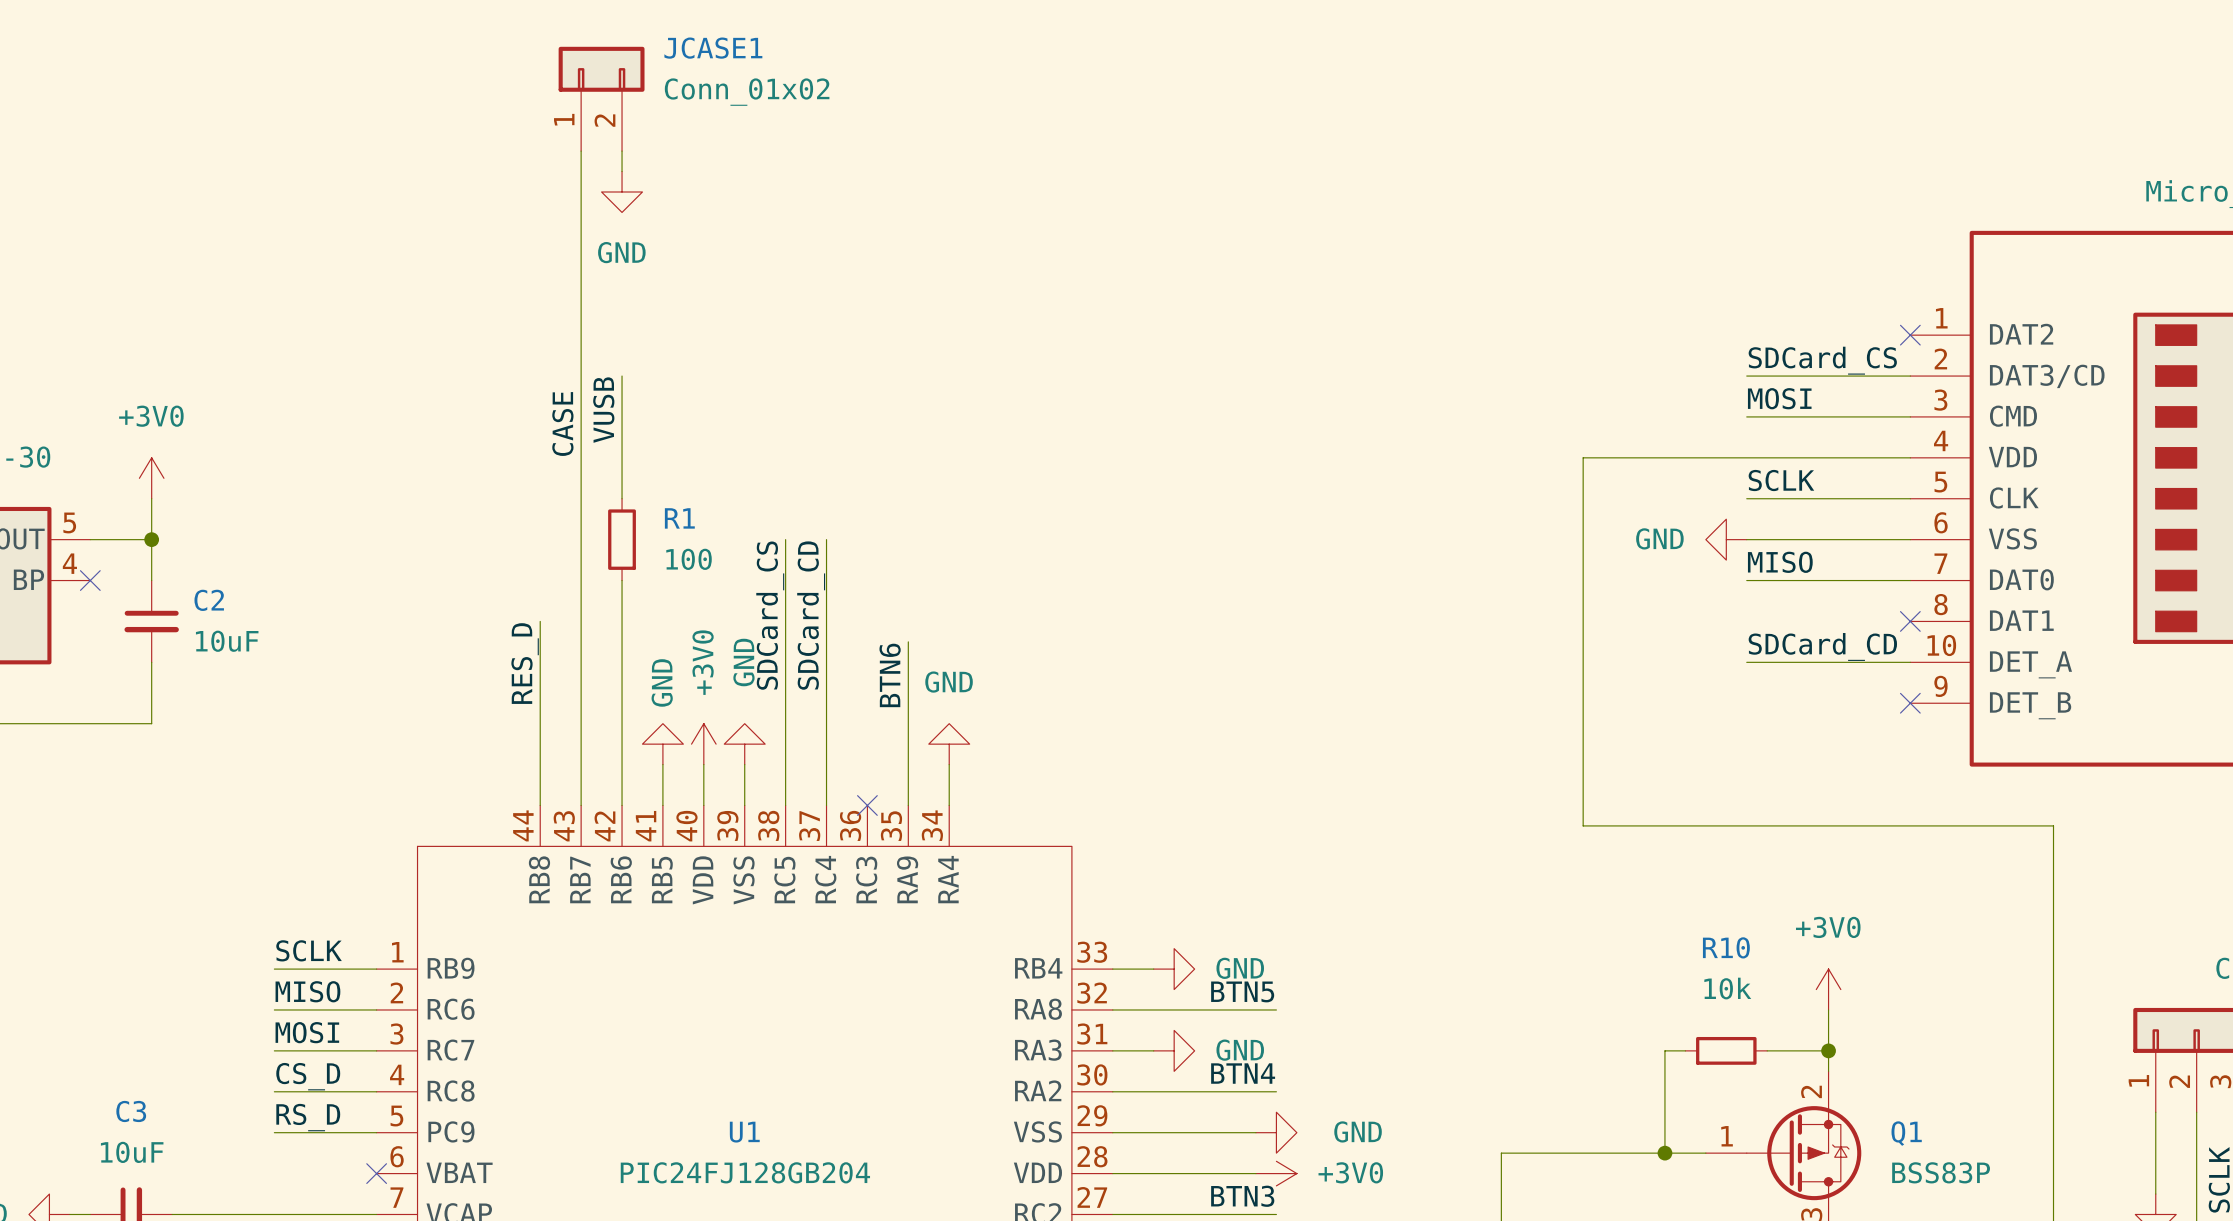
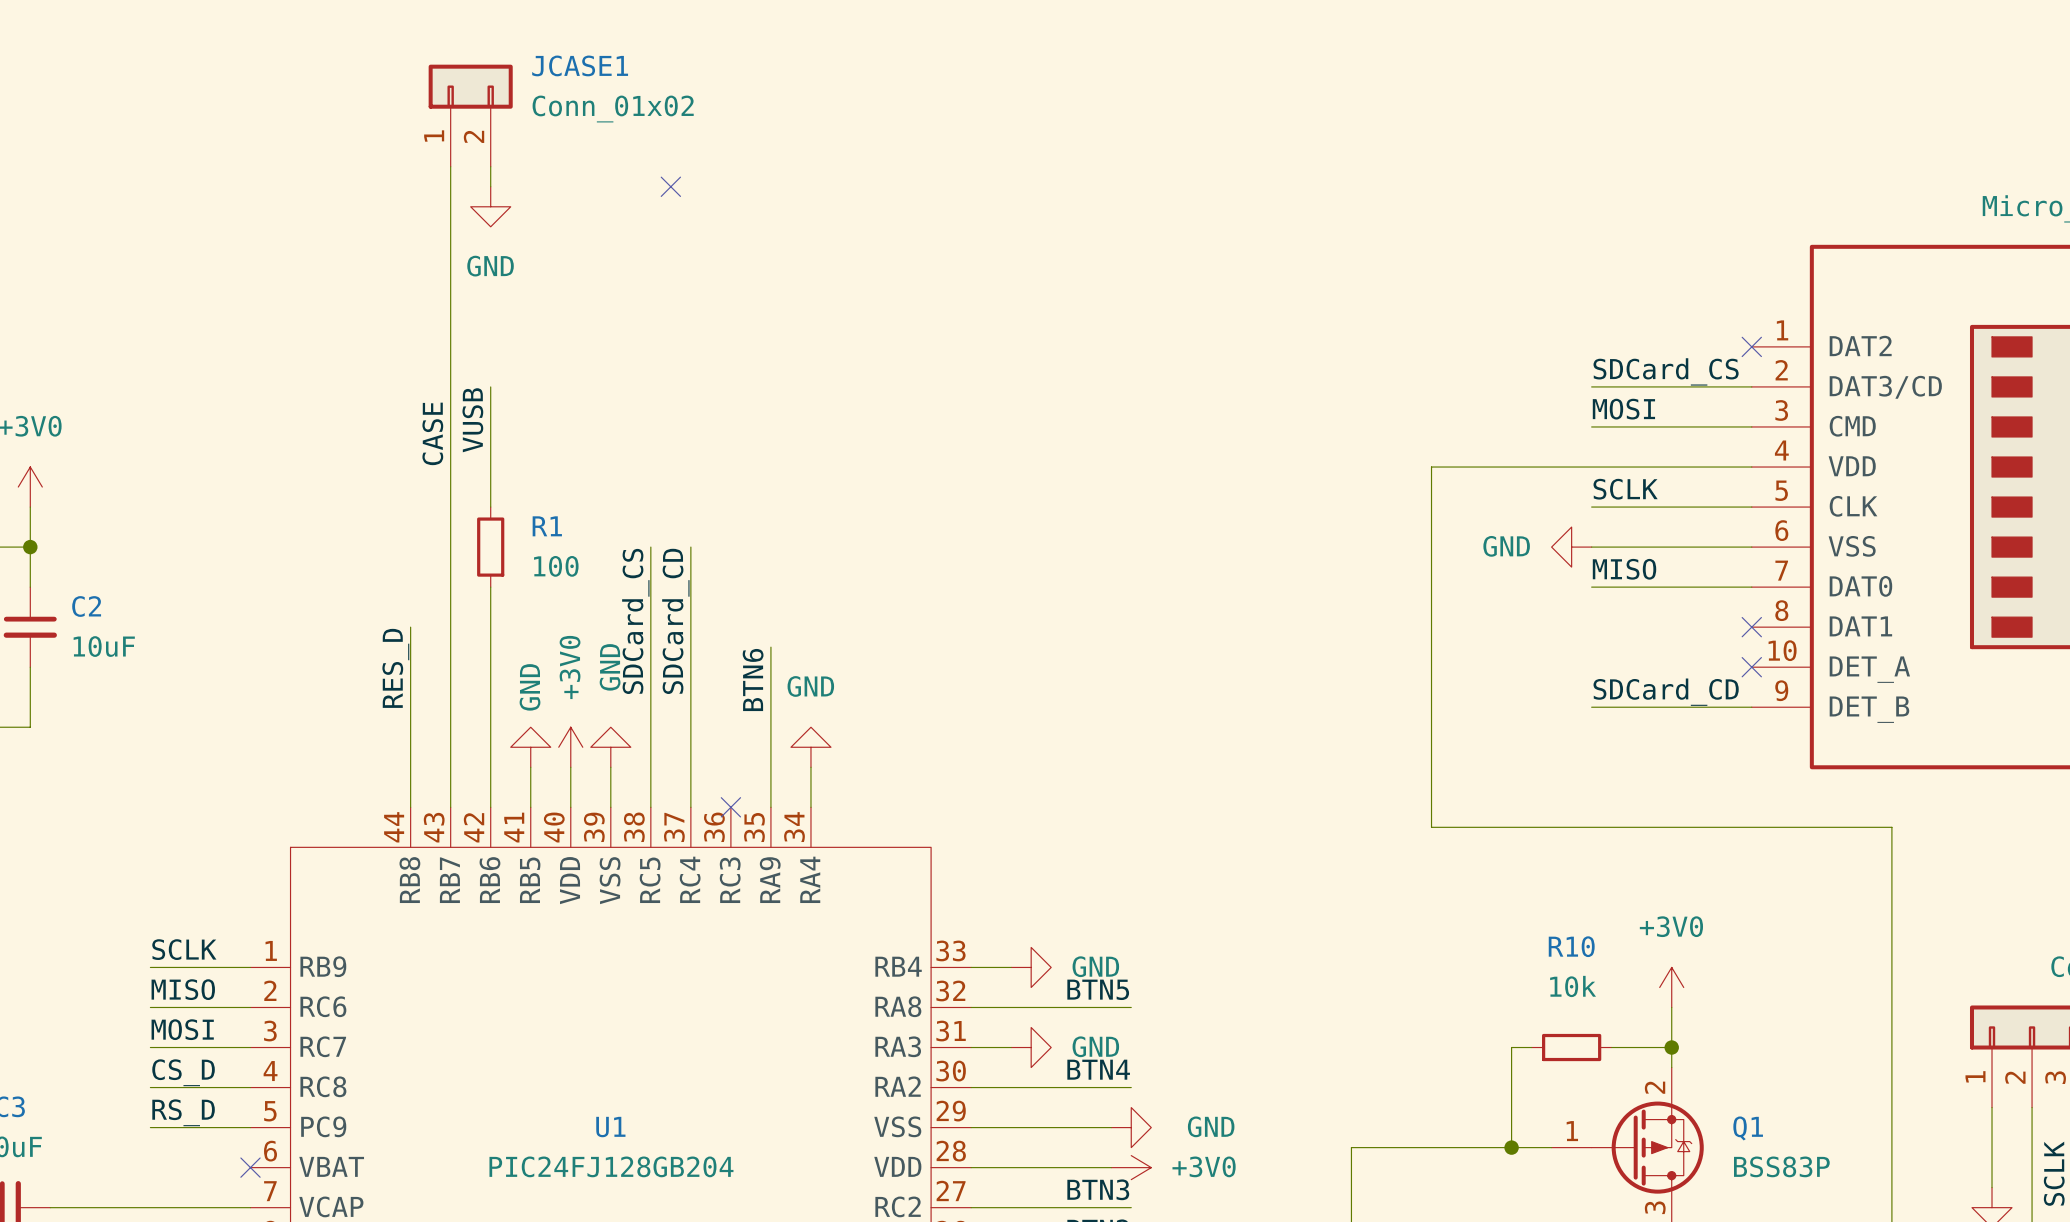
no-connect mark: none -> (670, 186)
label position: SDCard_CD (1822, 646) -> SDCard_CD (1666, 692)
wire: (1746, 662) (1910, 662) -> (1591, 707) (1751, 707)
no-connect mark position: (1910, 703) -> (1751, 667)

